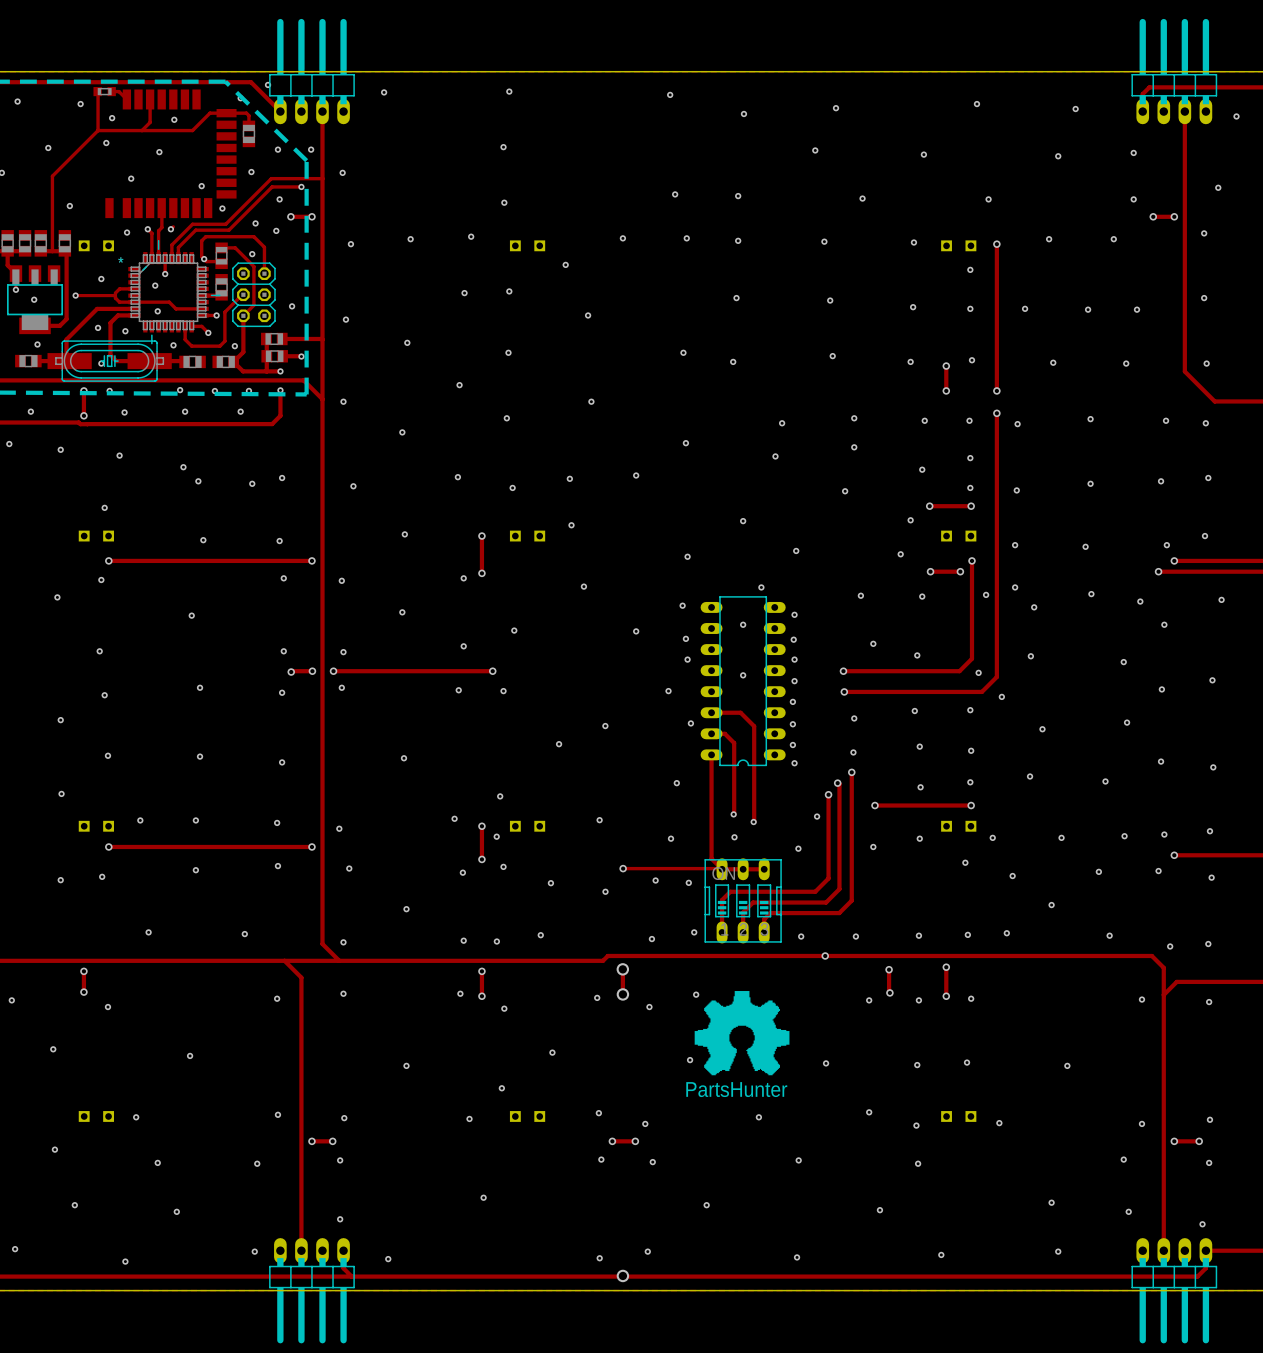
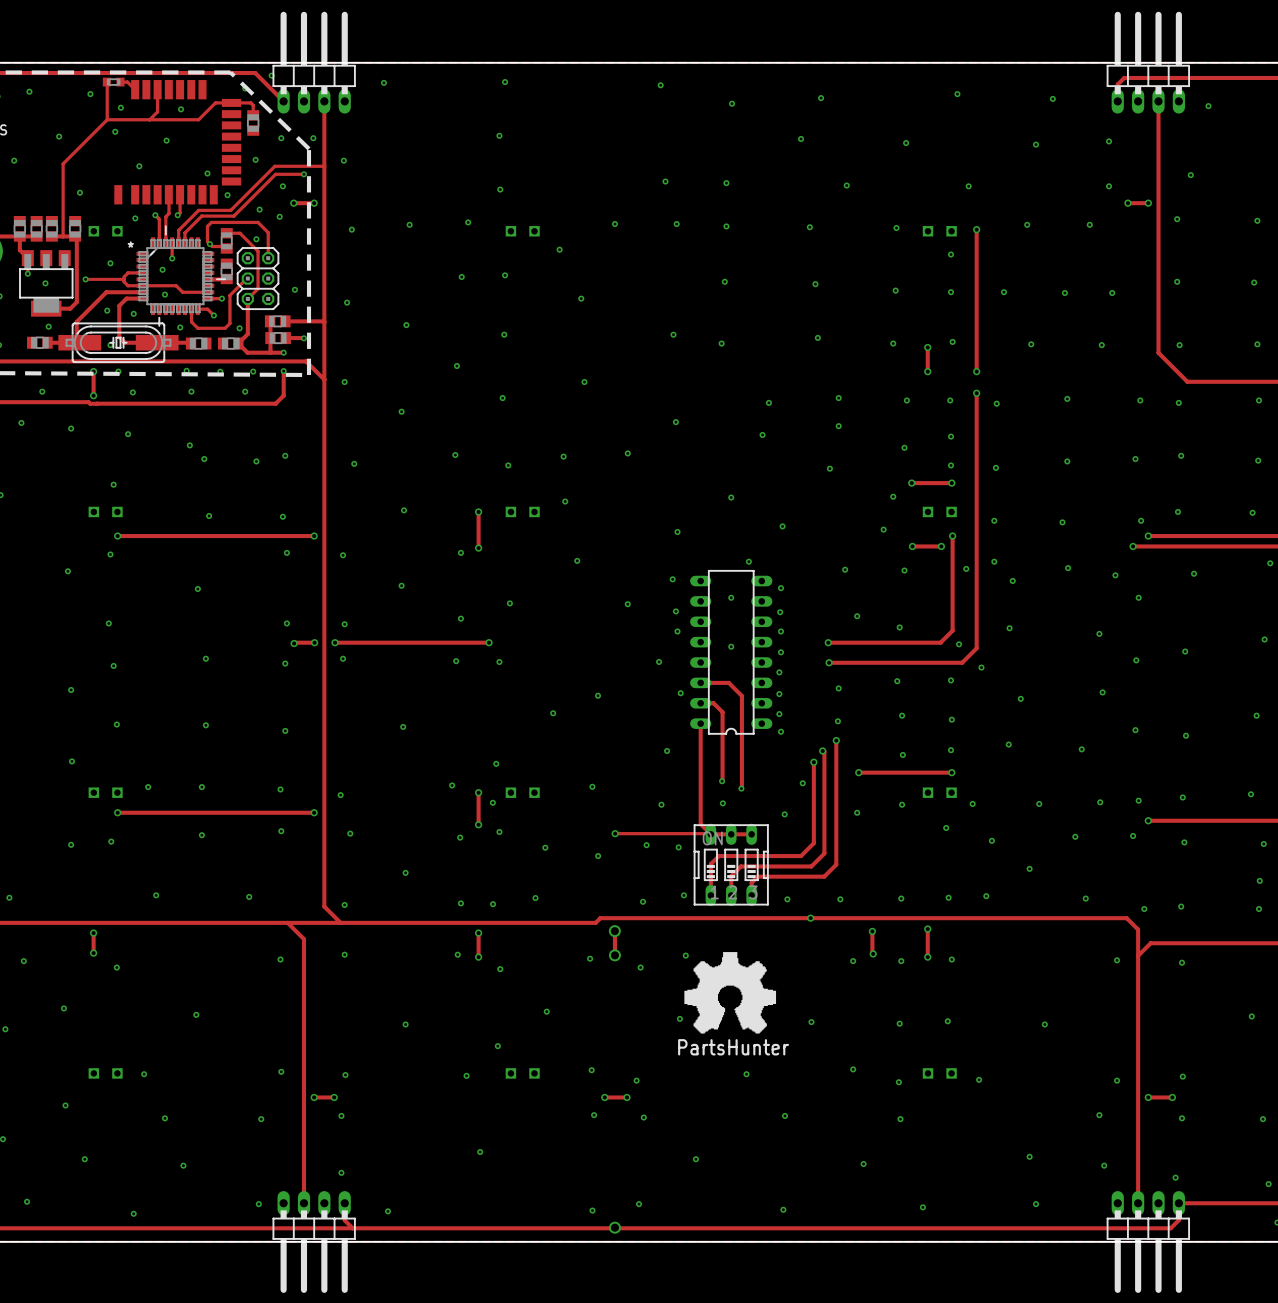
track: none -> (180, 194) (180, 212)

